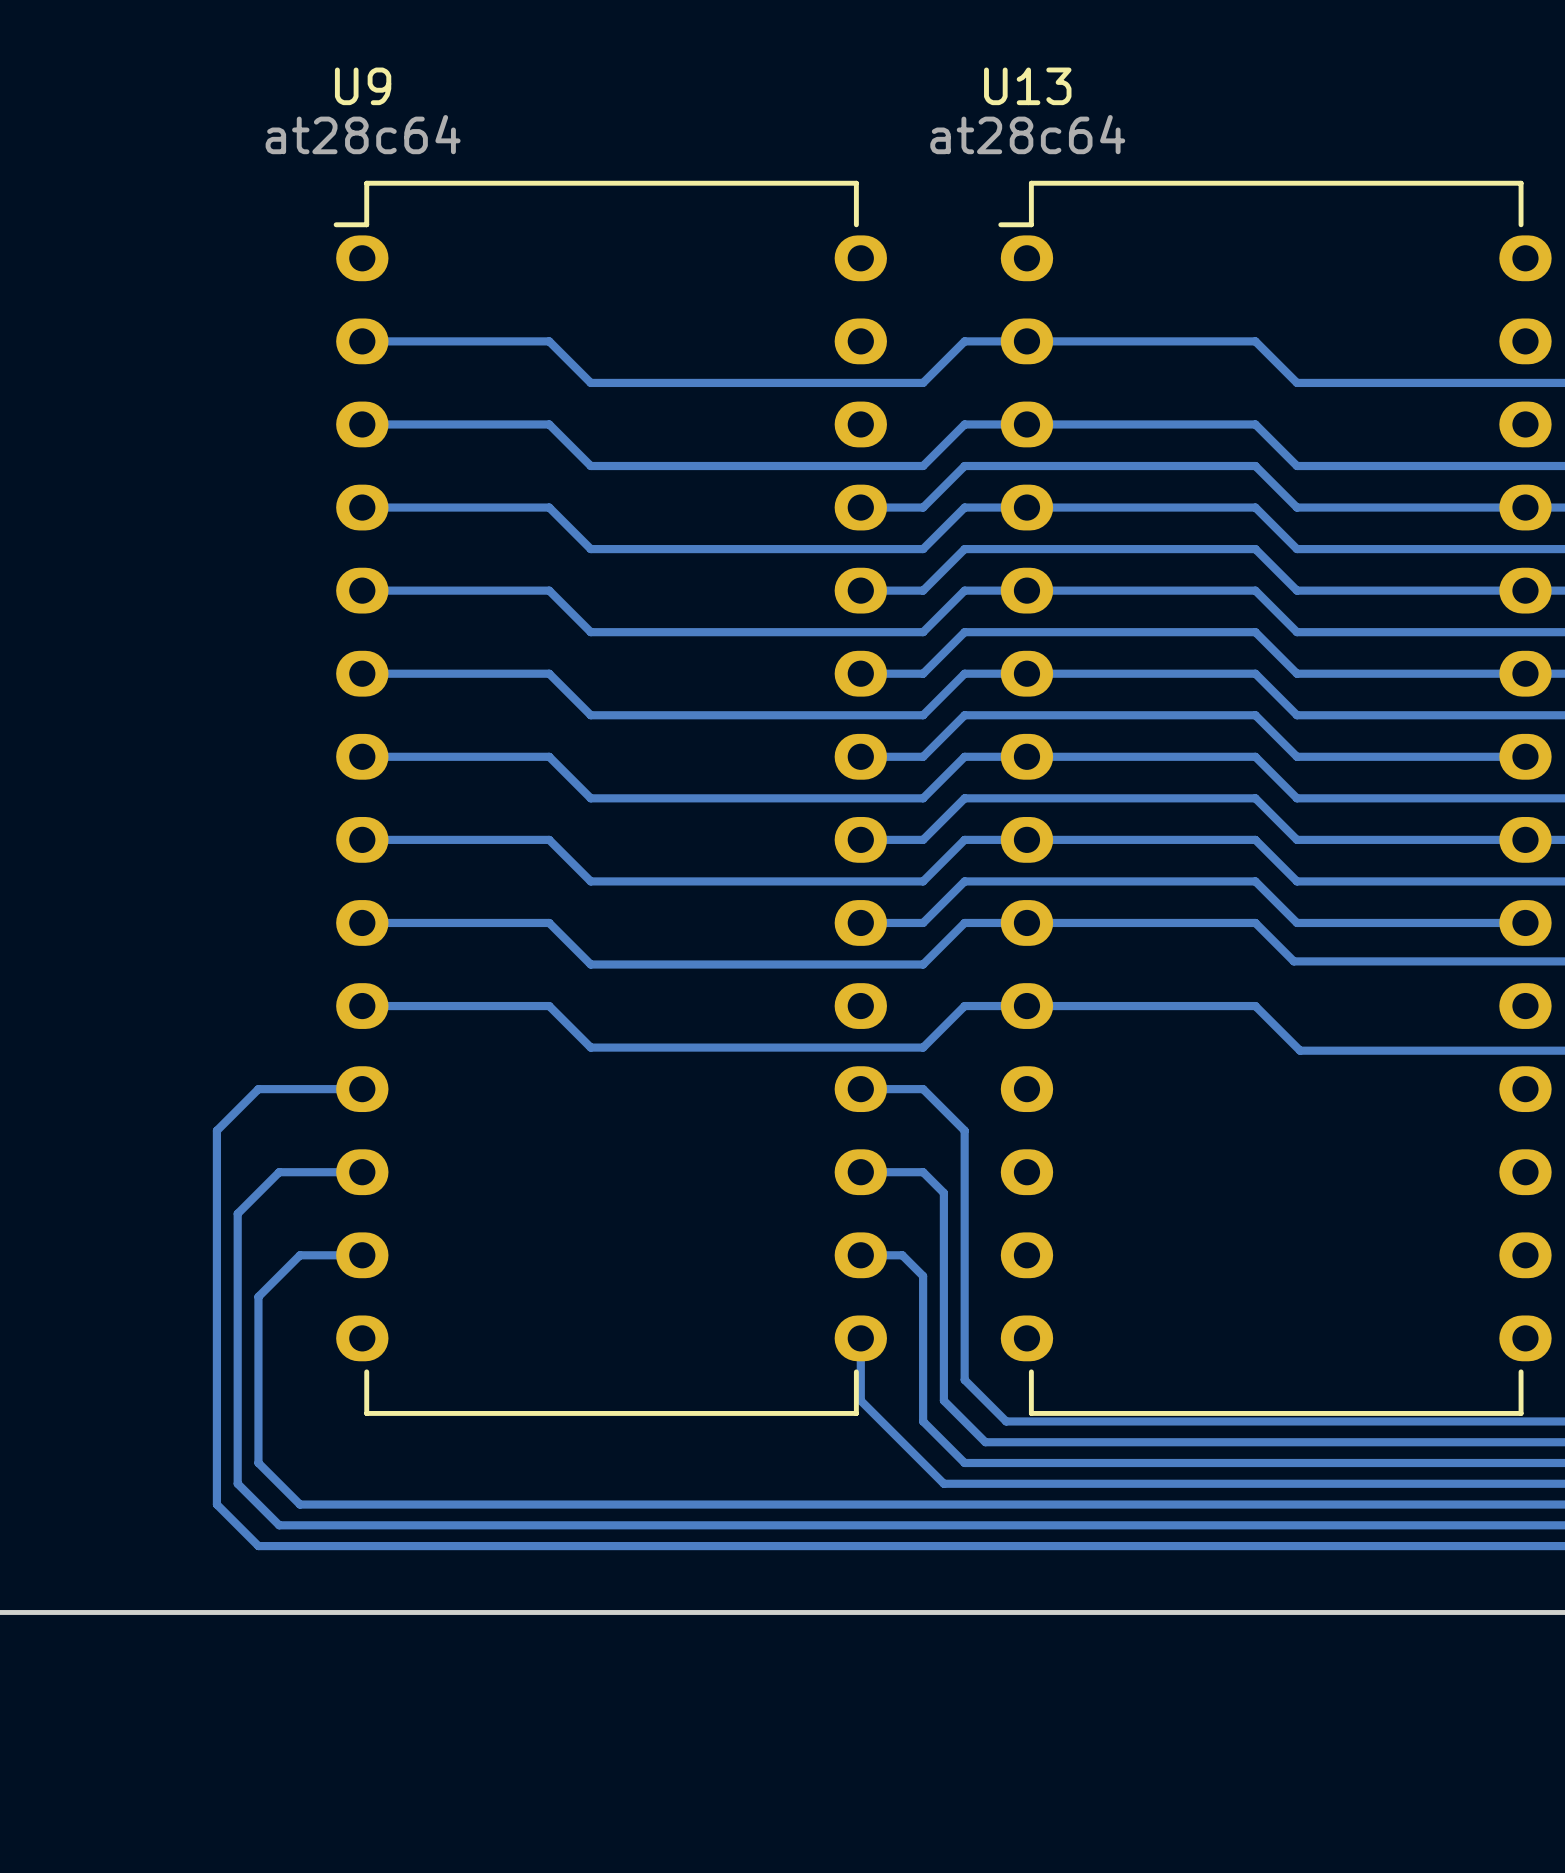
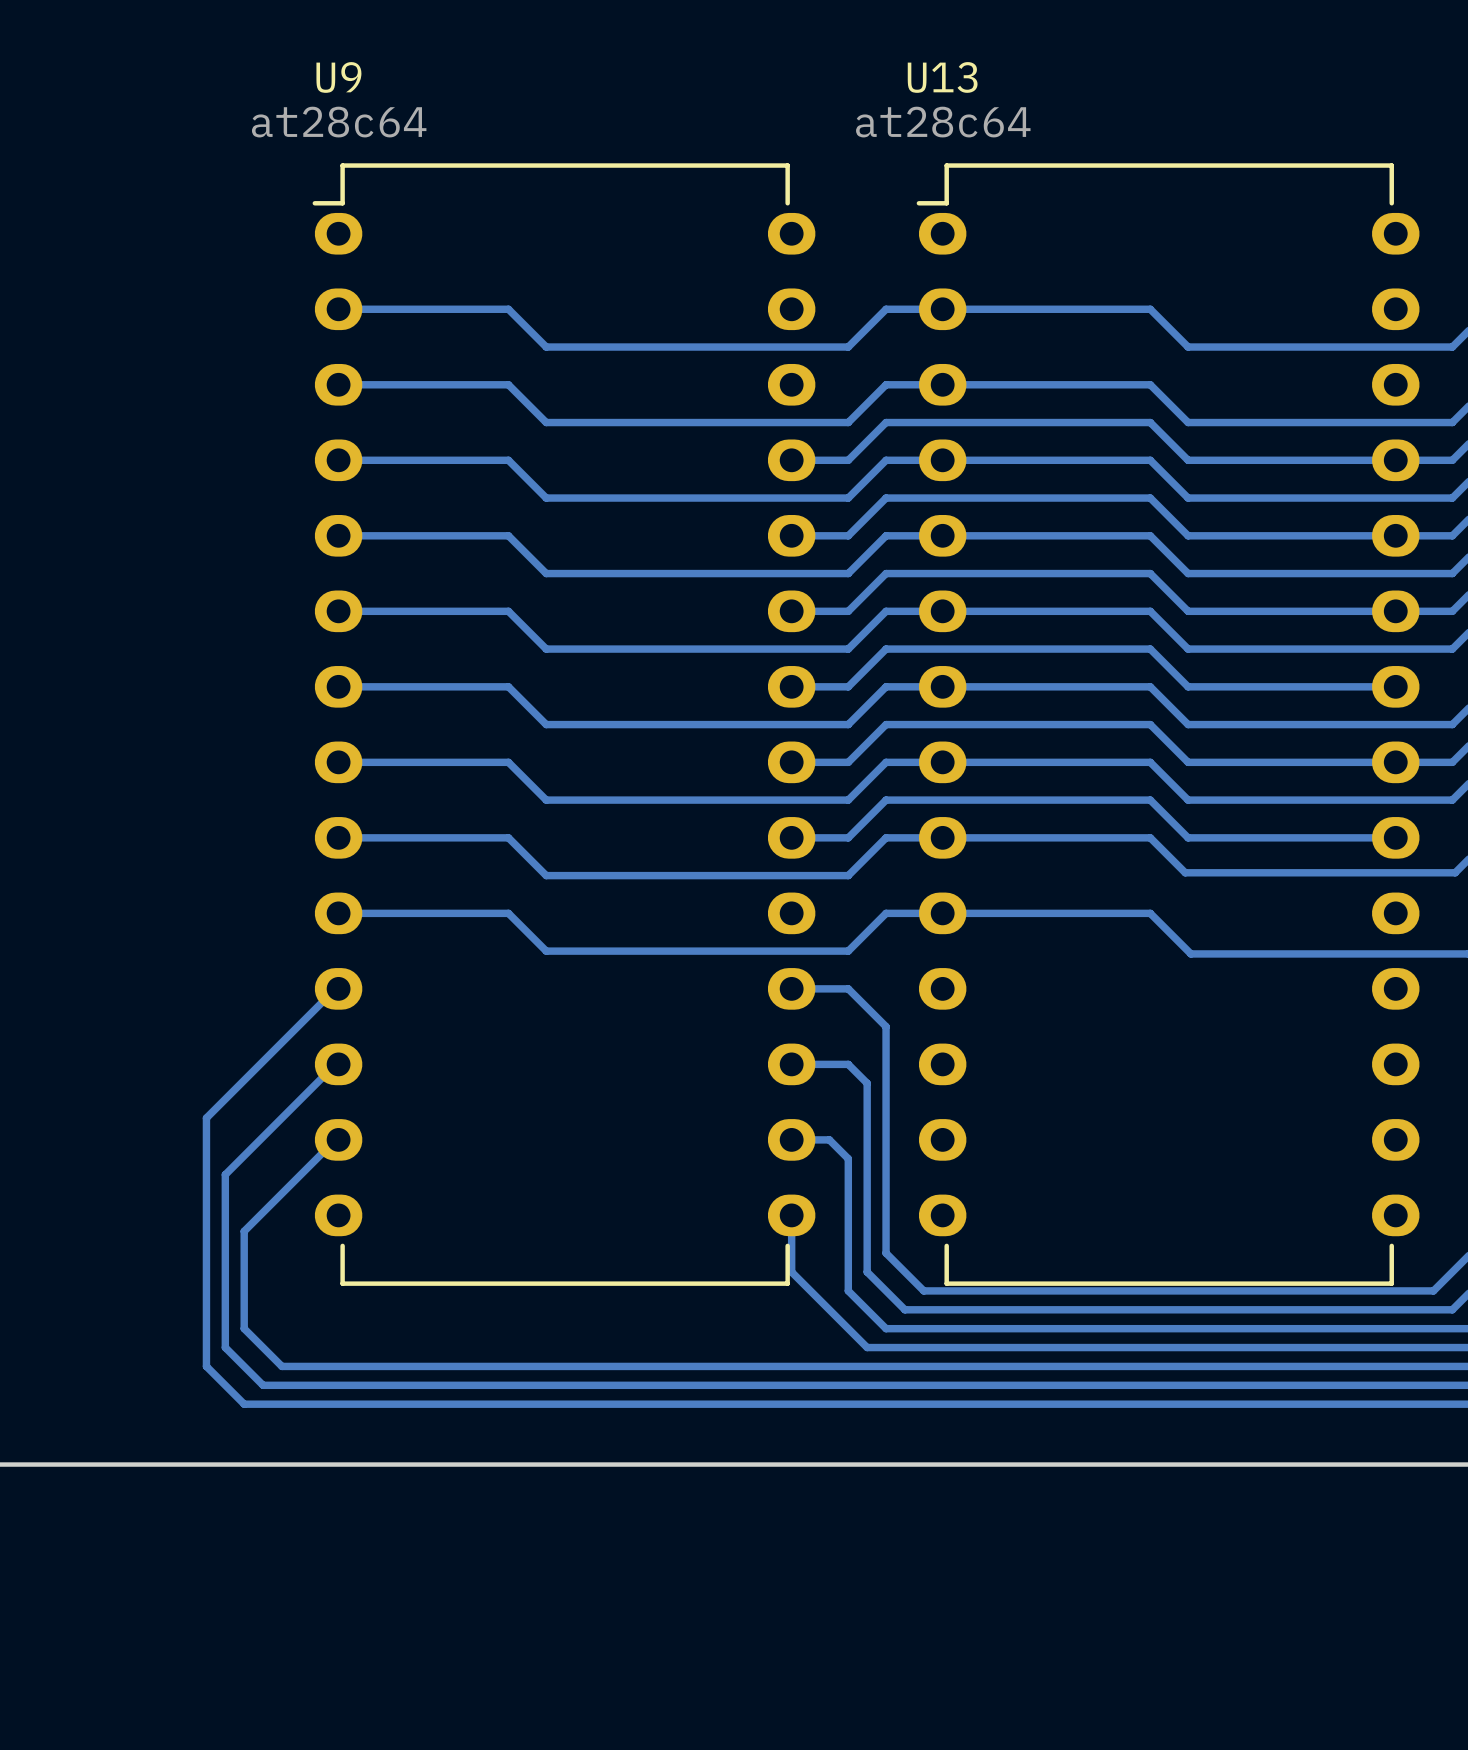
bottom track: (359, 1089) (258, 1089) (216, 1130) (216, 1231) -> (335, 988) (206, 1118)
bottom track: (359, 1172) (279, 1172) (237, 1213) (237, 1293) -> (335, 1064) (225, 1174)
bottom track: (359, 1255) (300, 1255) (258, 1296) (258, 1355) -> (335, 1139) (244, 1231)

